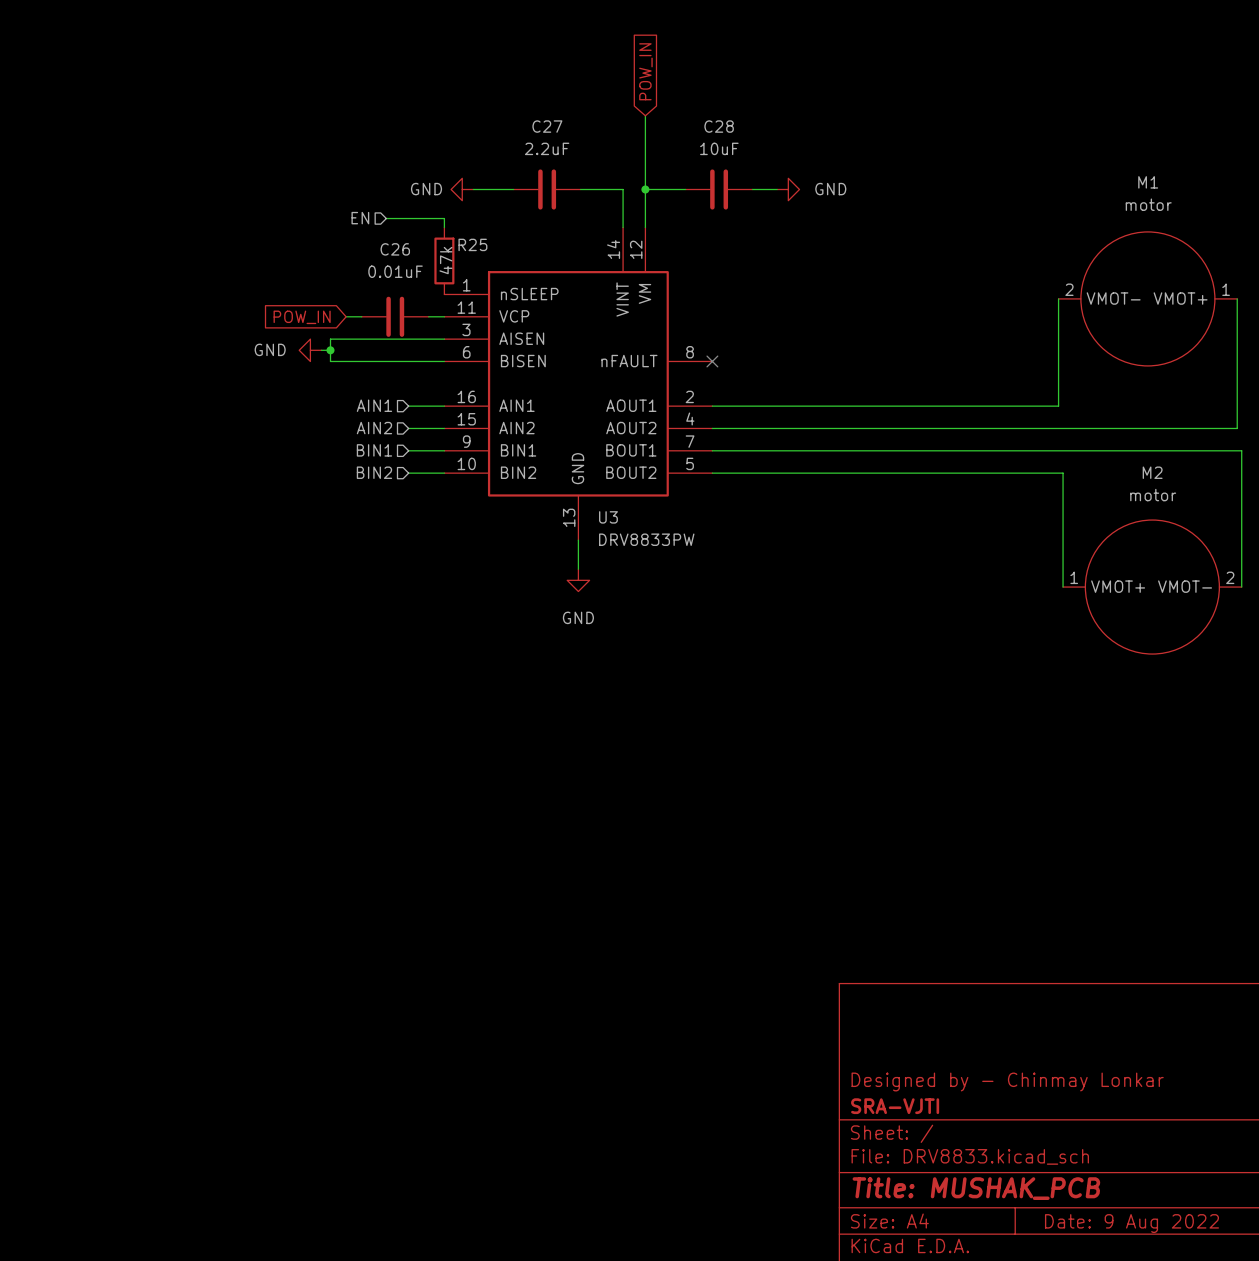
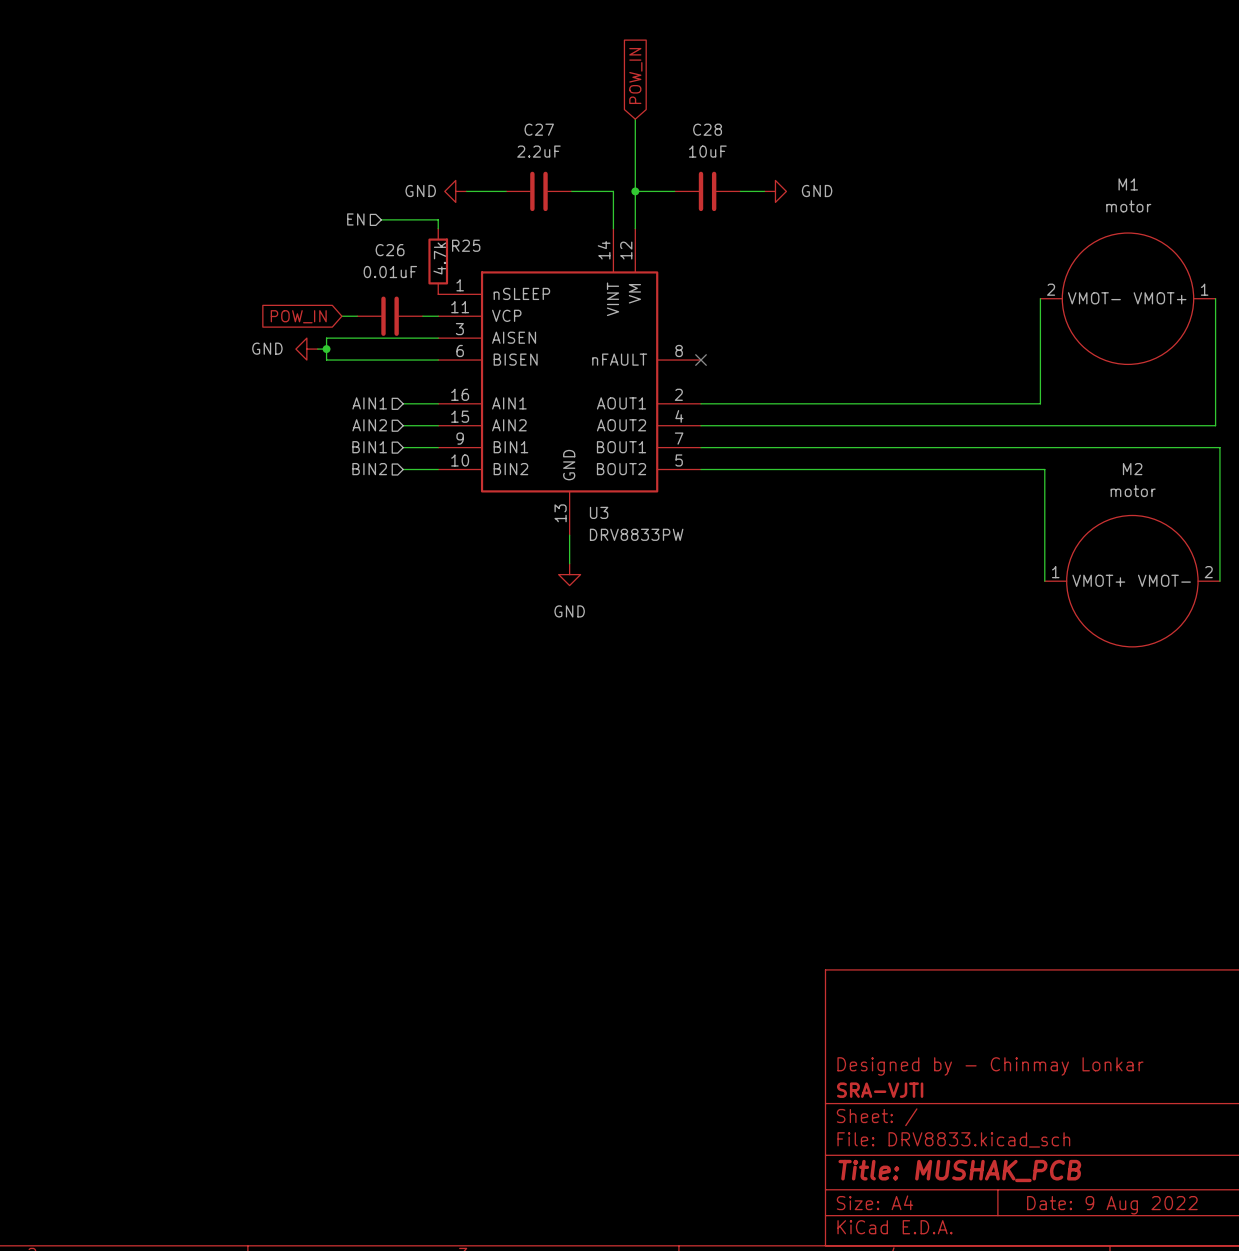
R25 value: 47k (445, 260) -> 4.7k (439, 258)

